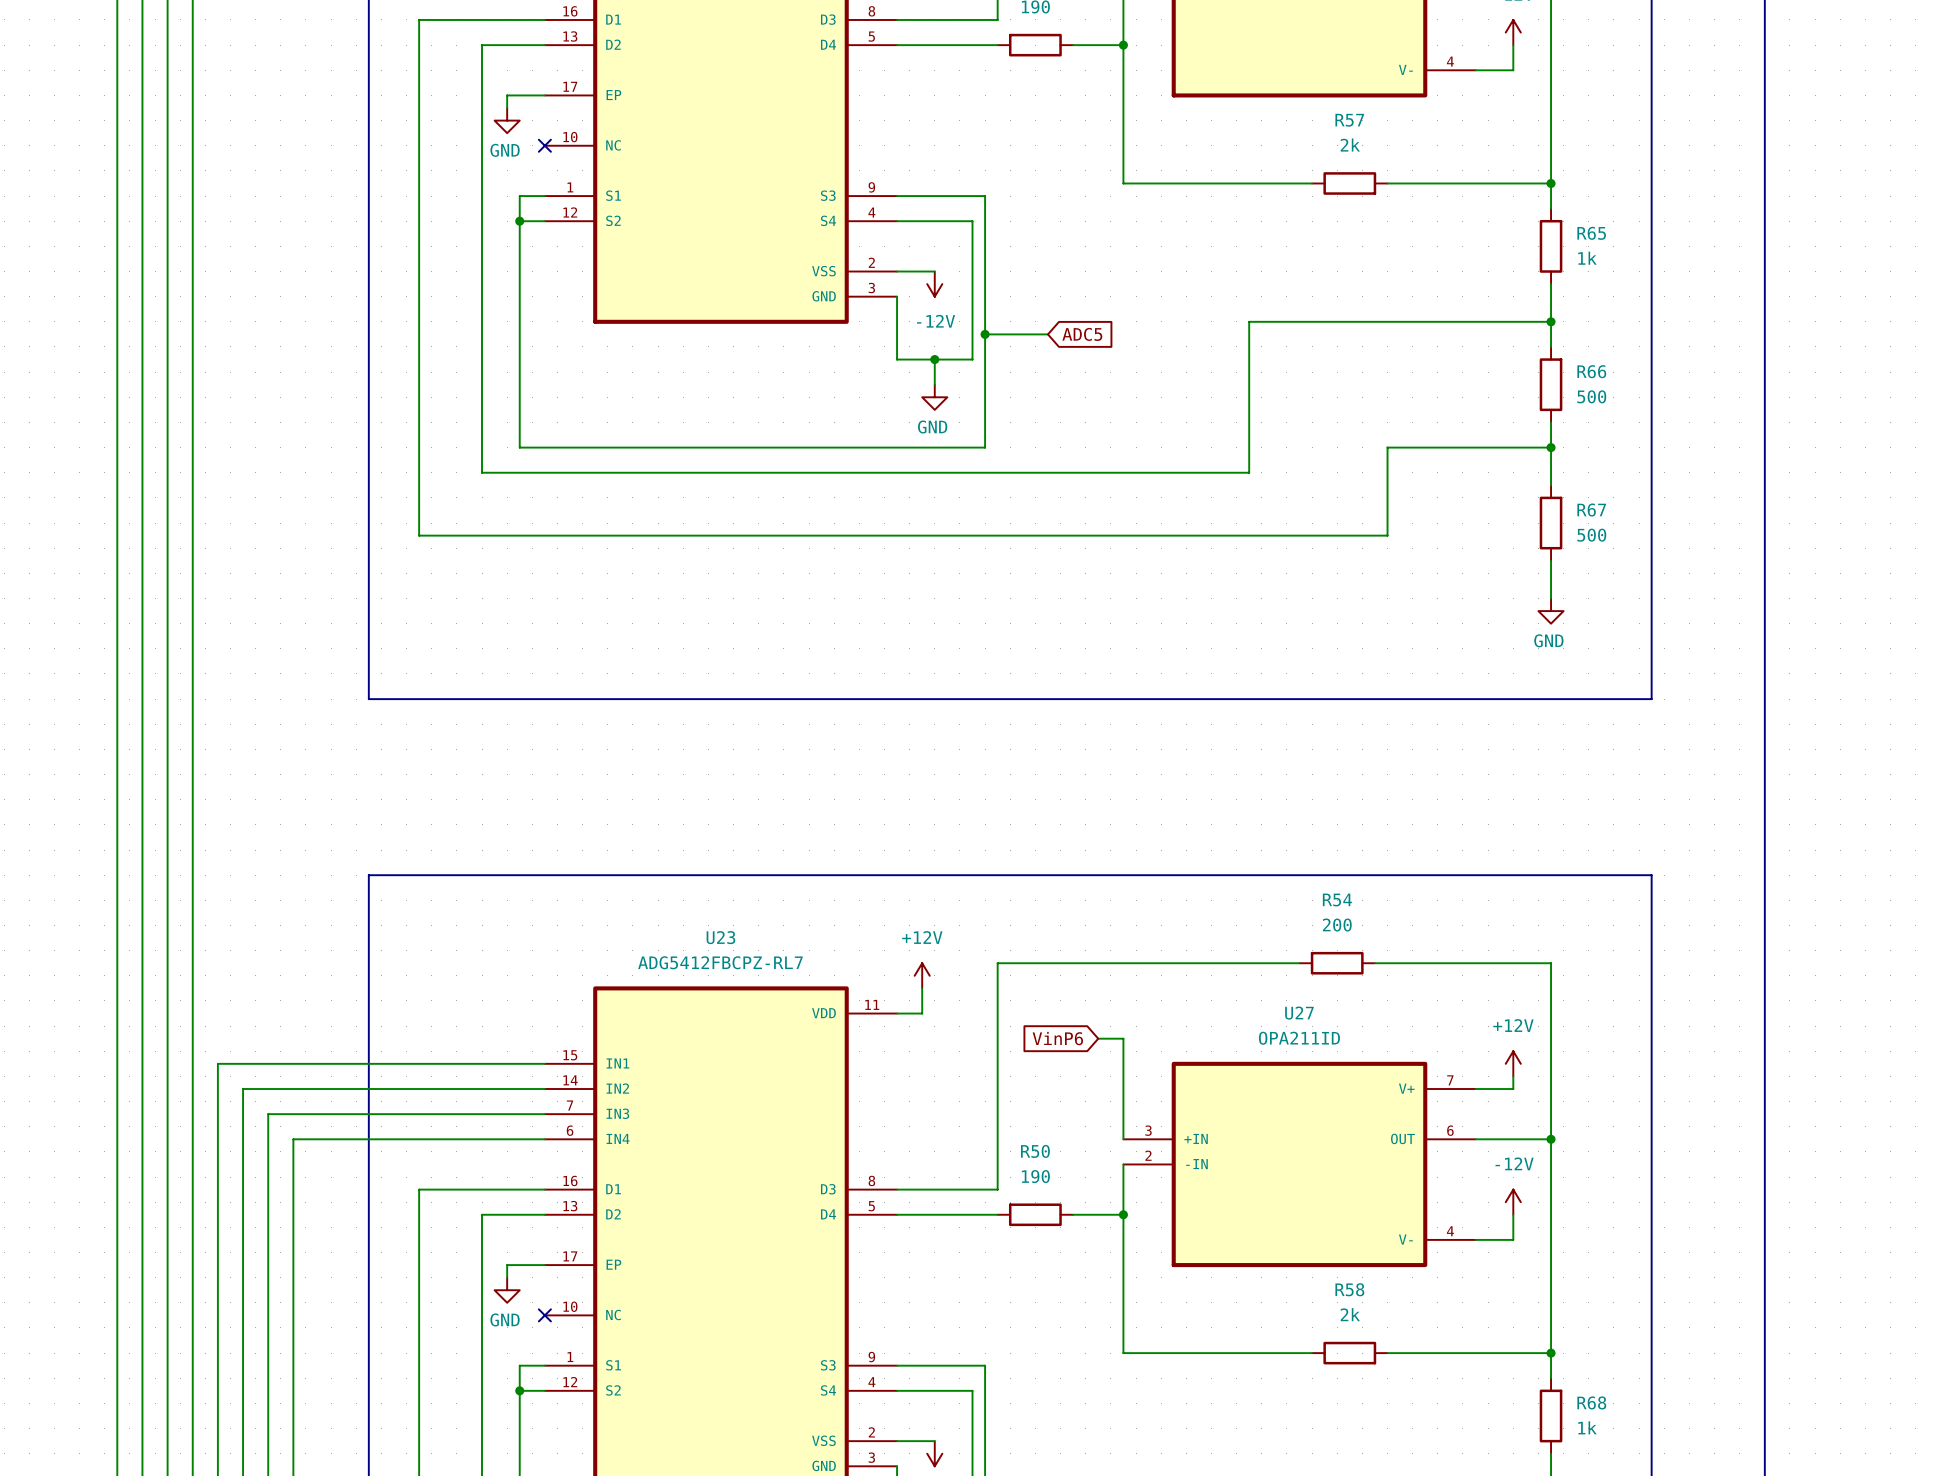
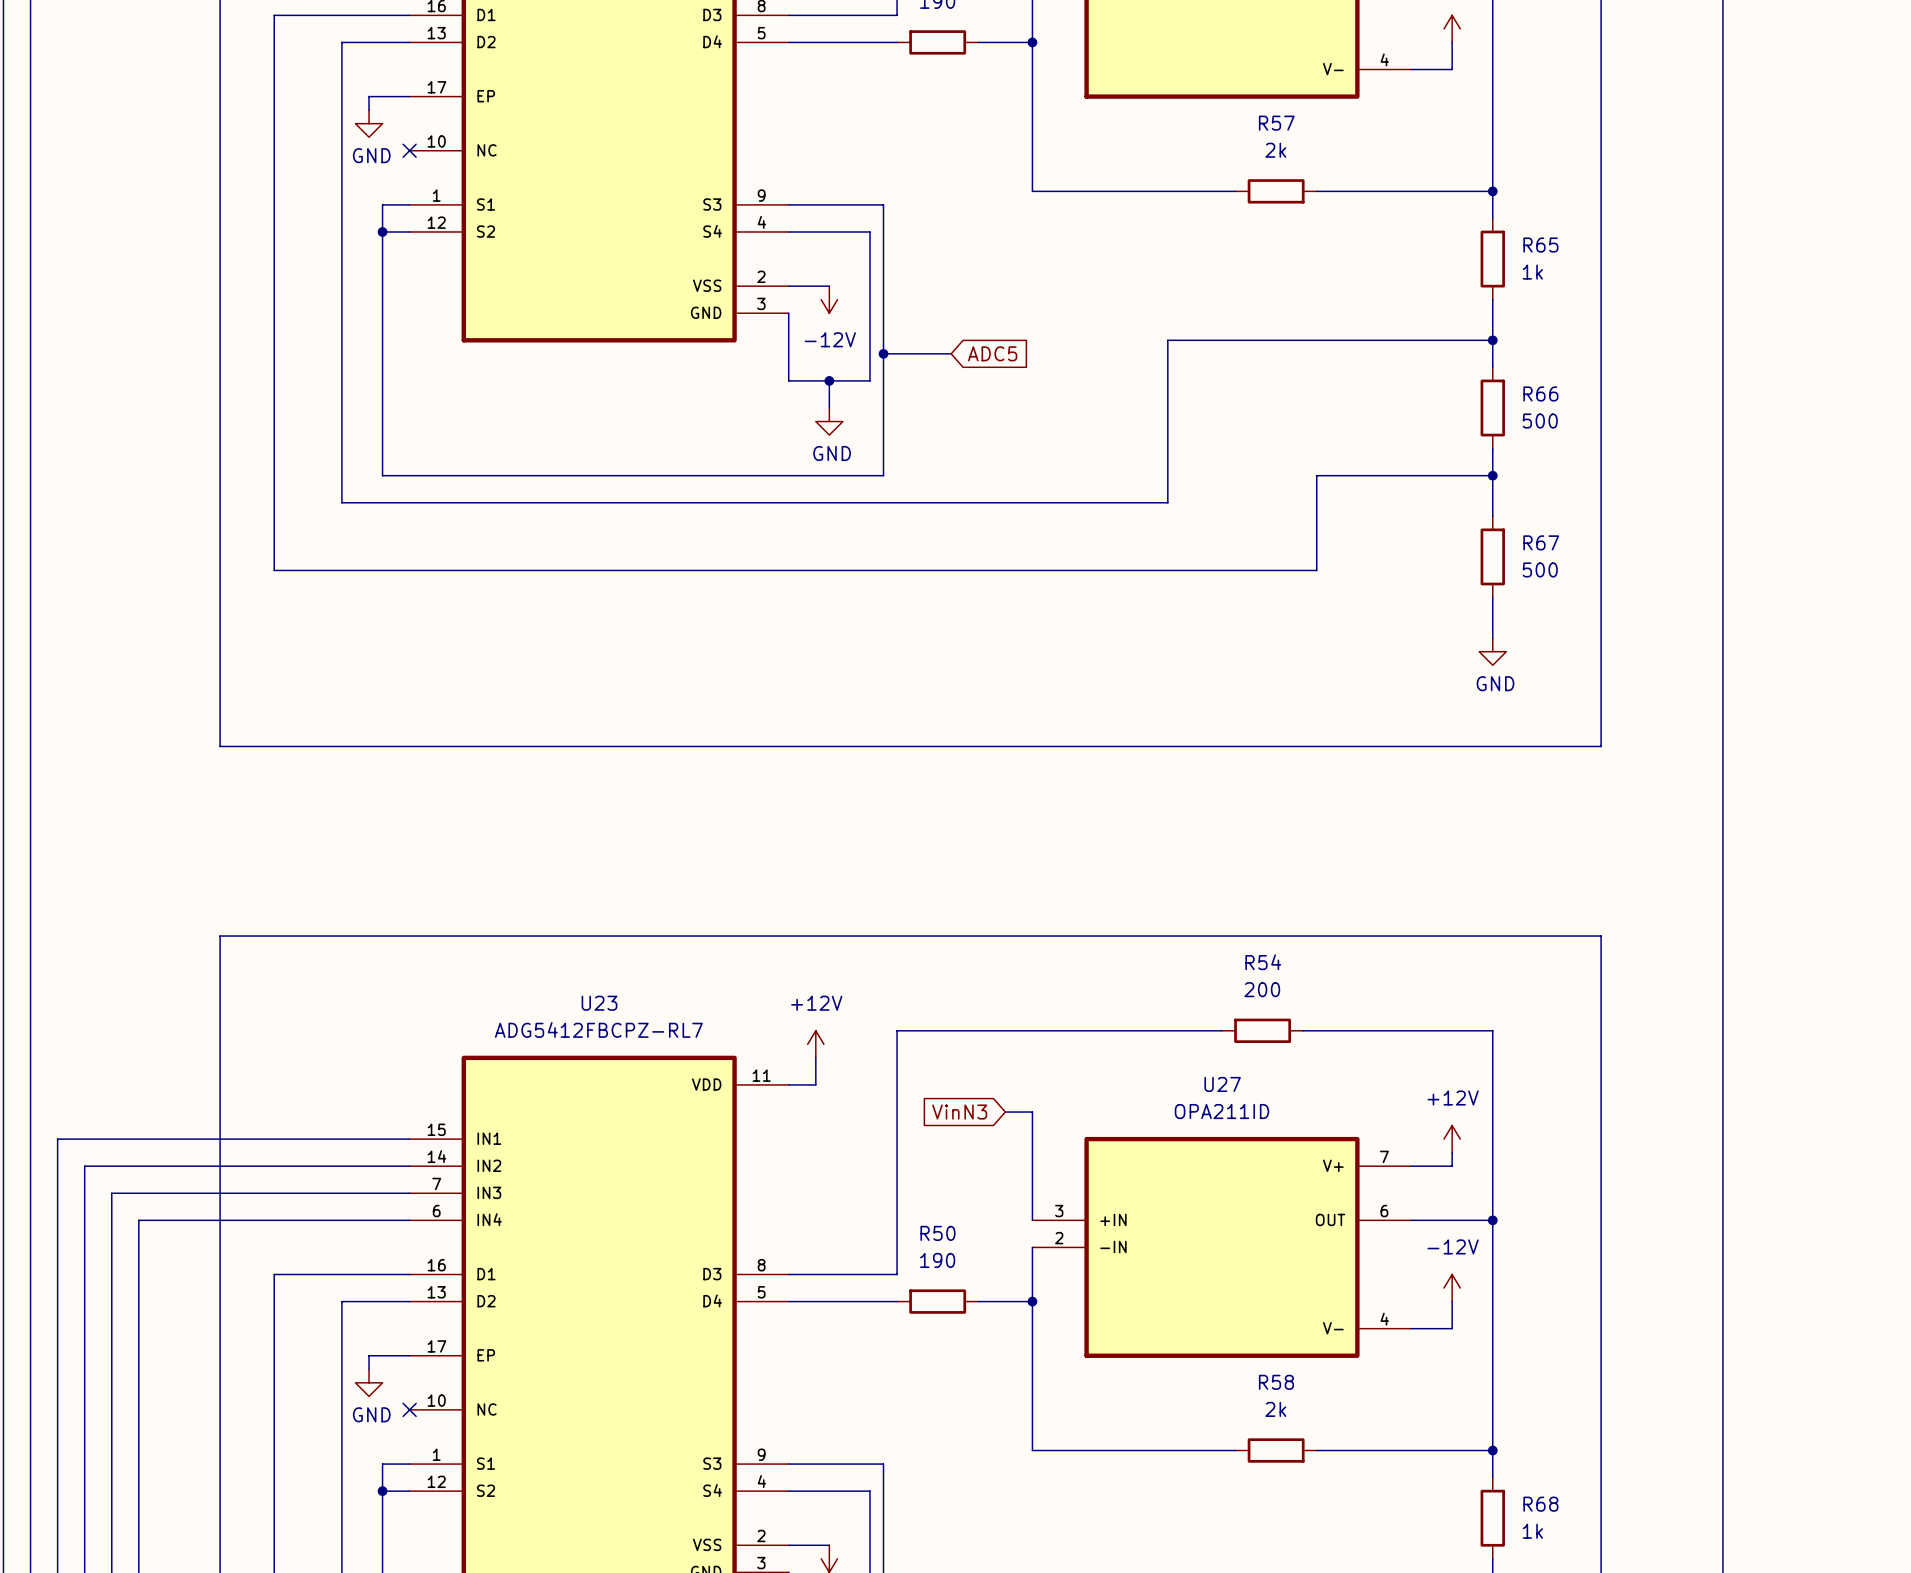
global label: VinP6 (1057, 1038) -> VinN3 (959, 1112)

